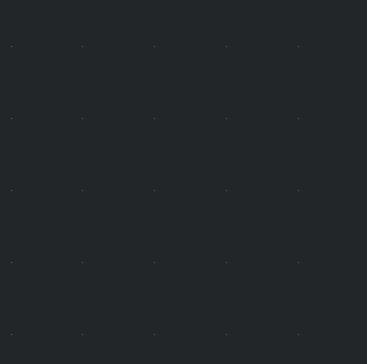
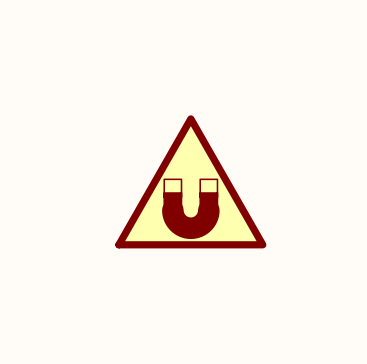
part: none -> (190, 181)

